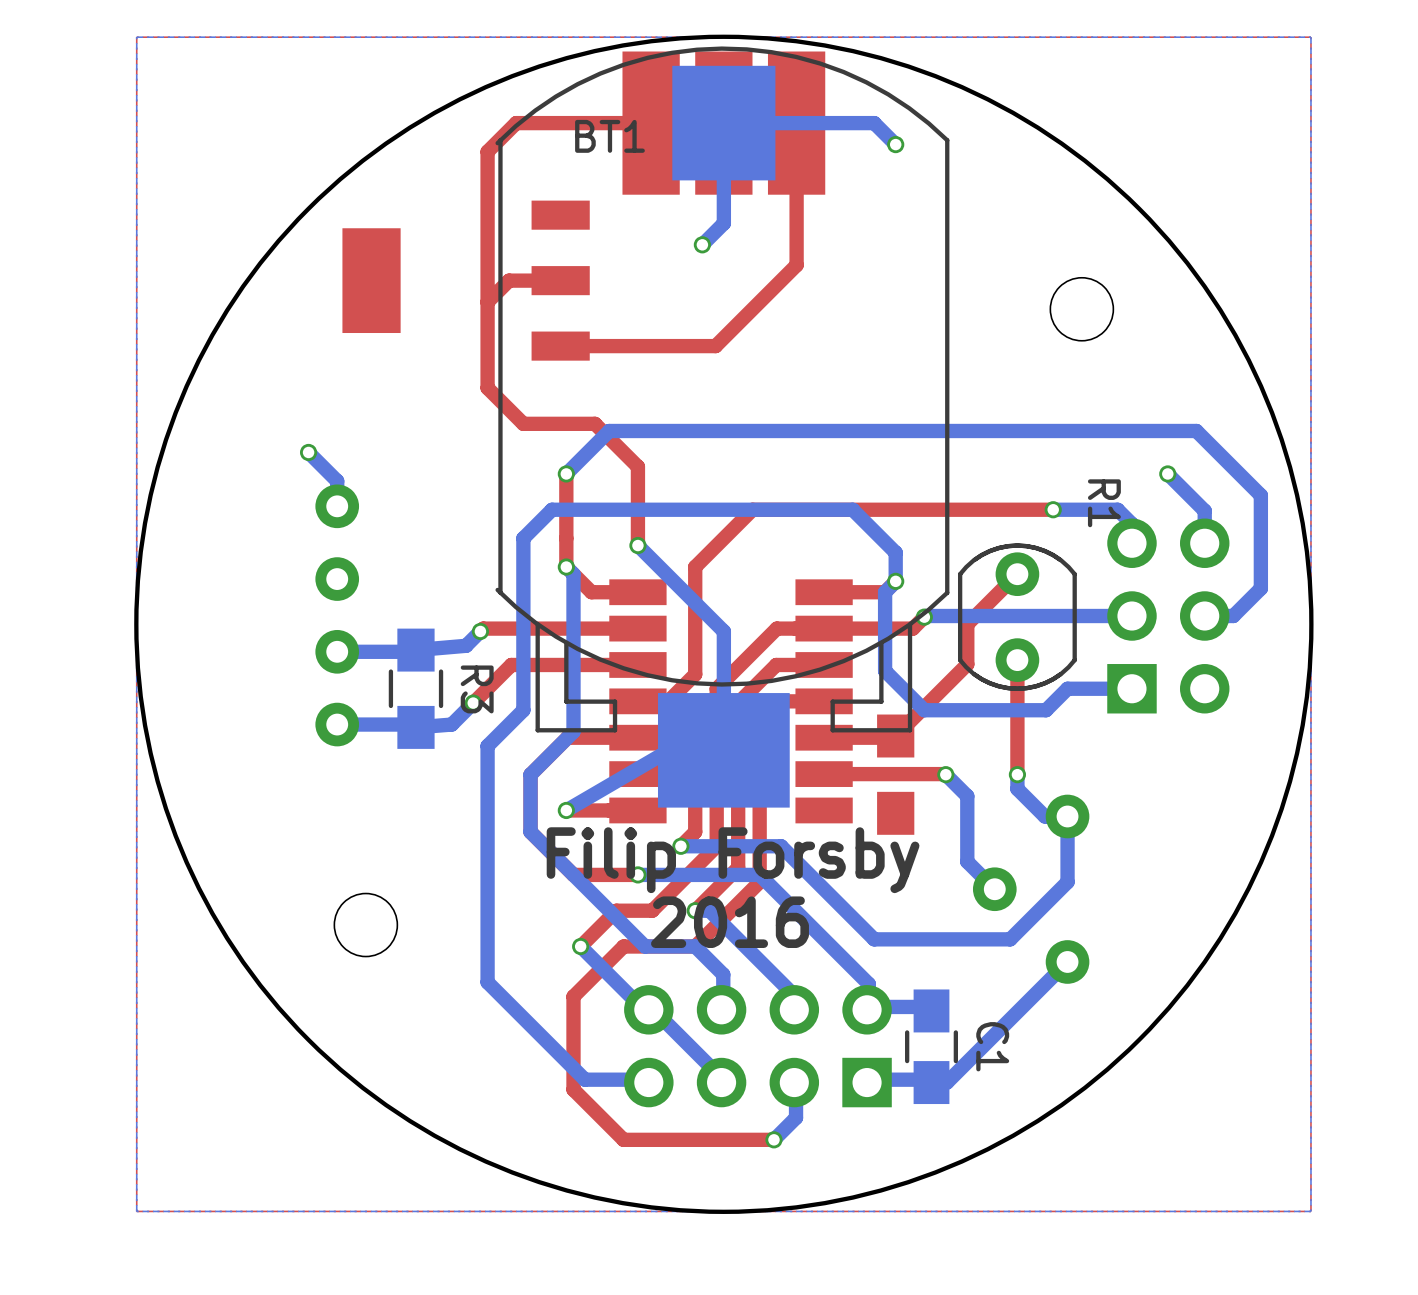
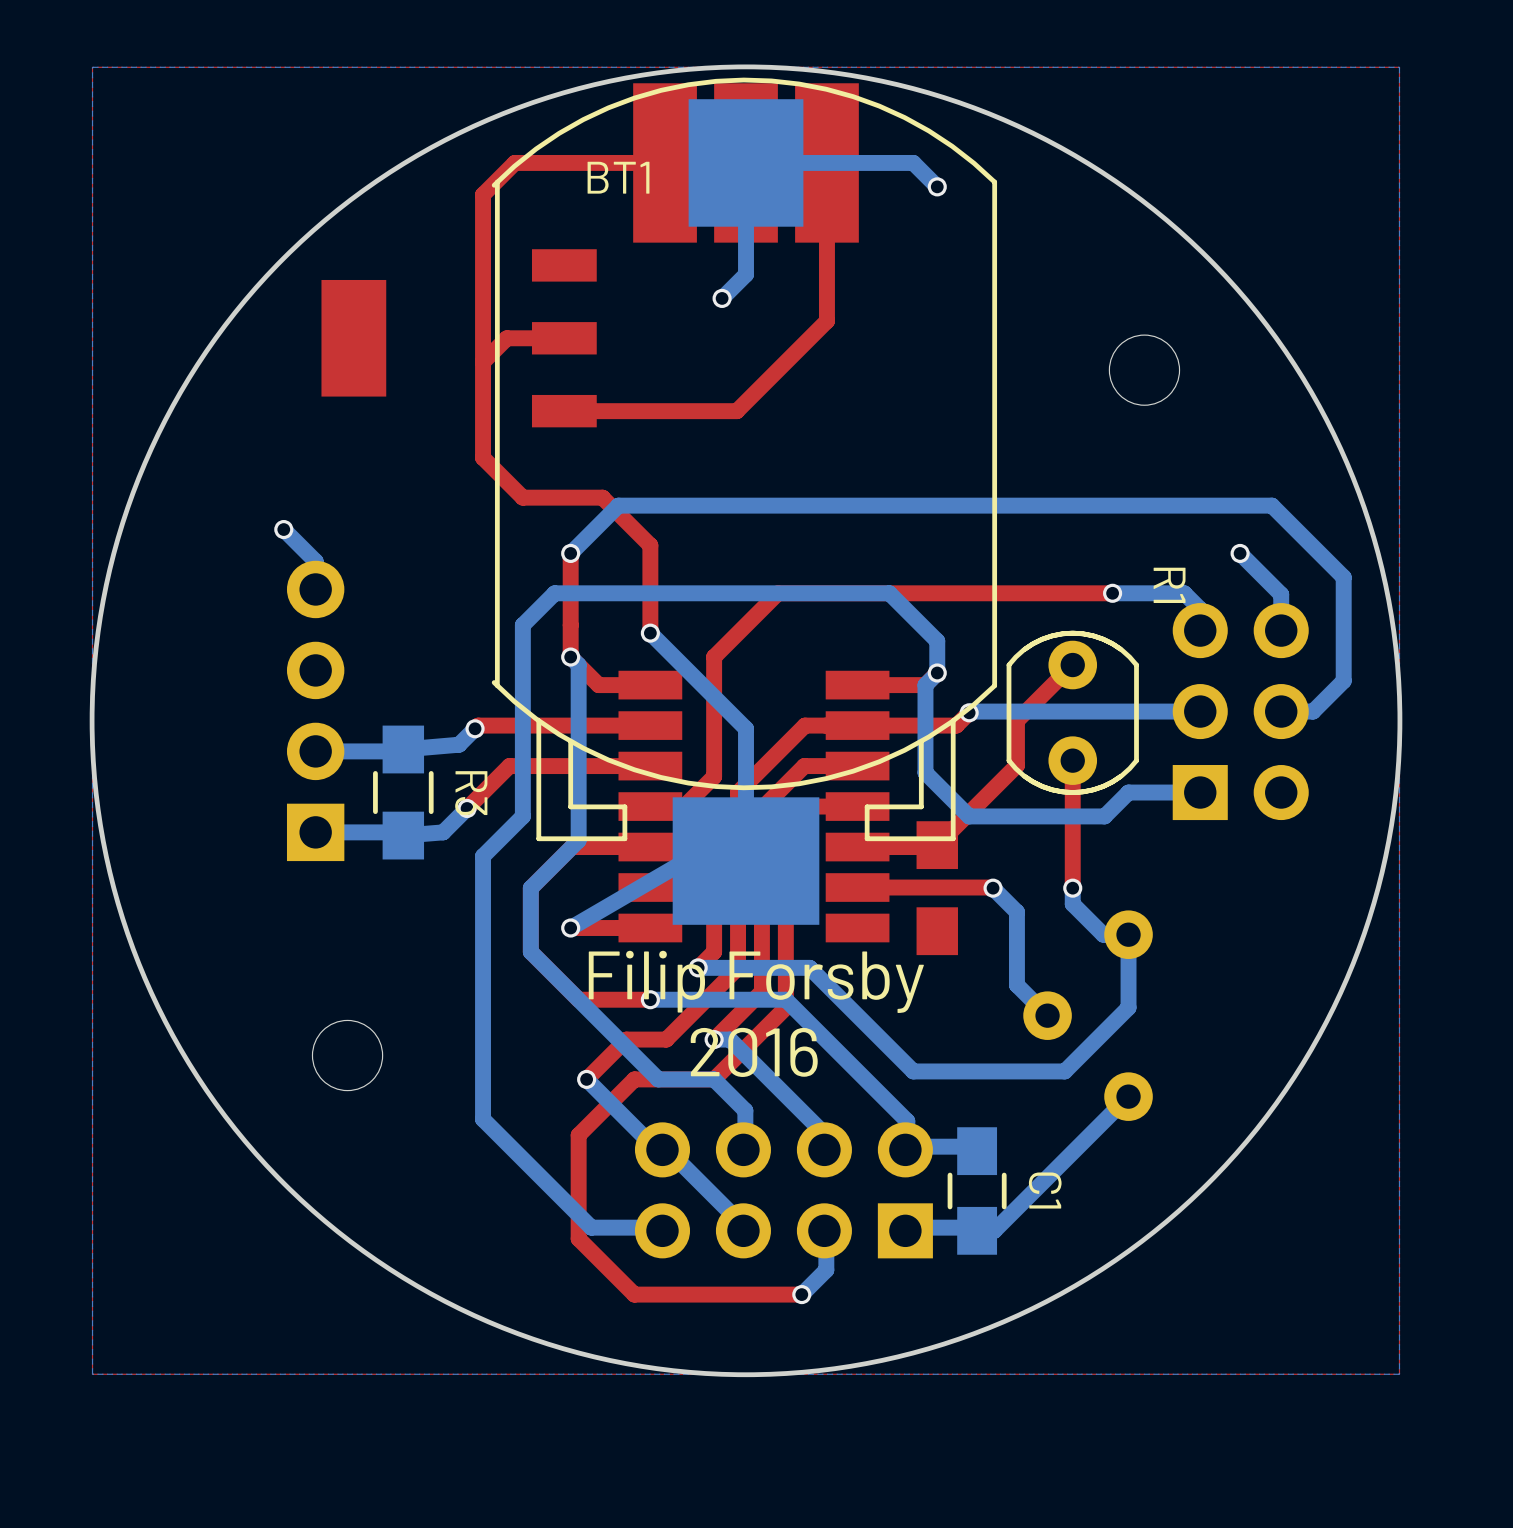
part footprint: [315, 484, 360, 747] -> [286, 560, 345, 862]

